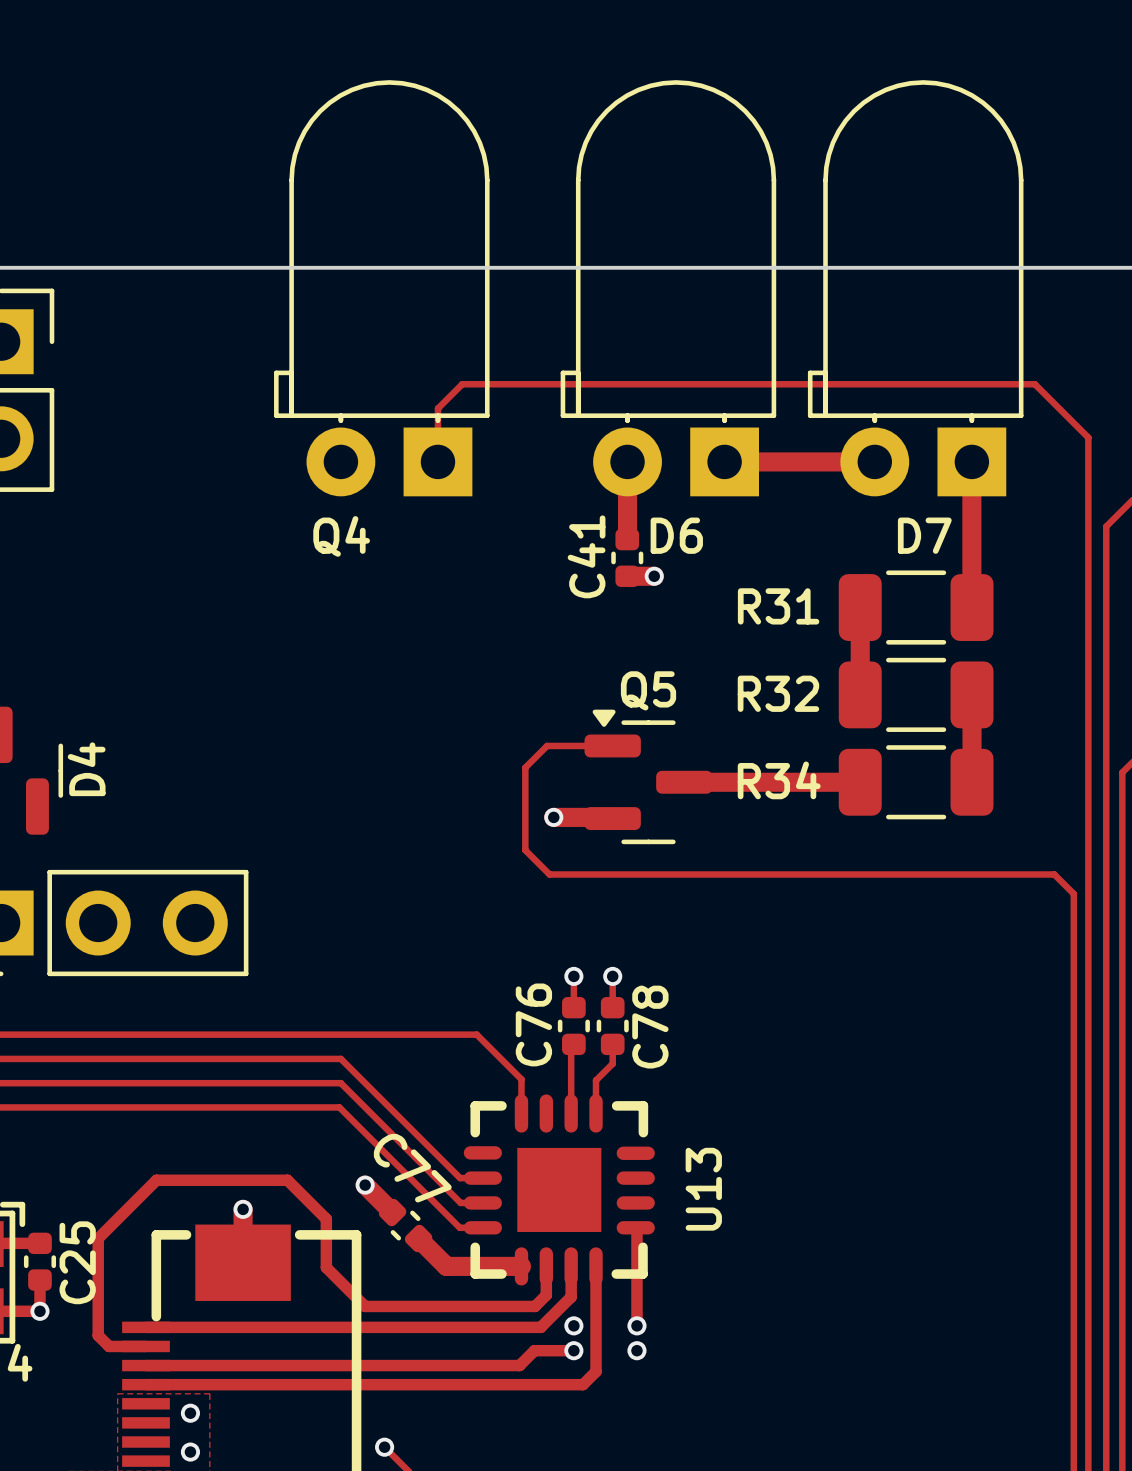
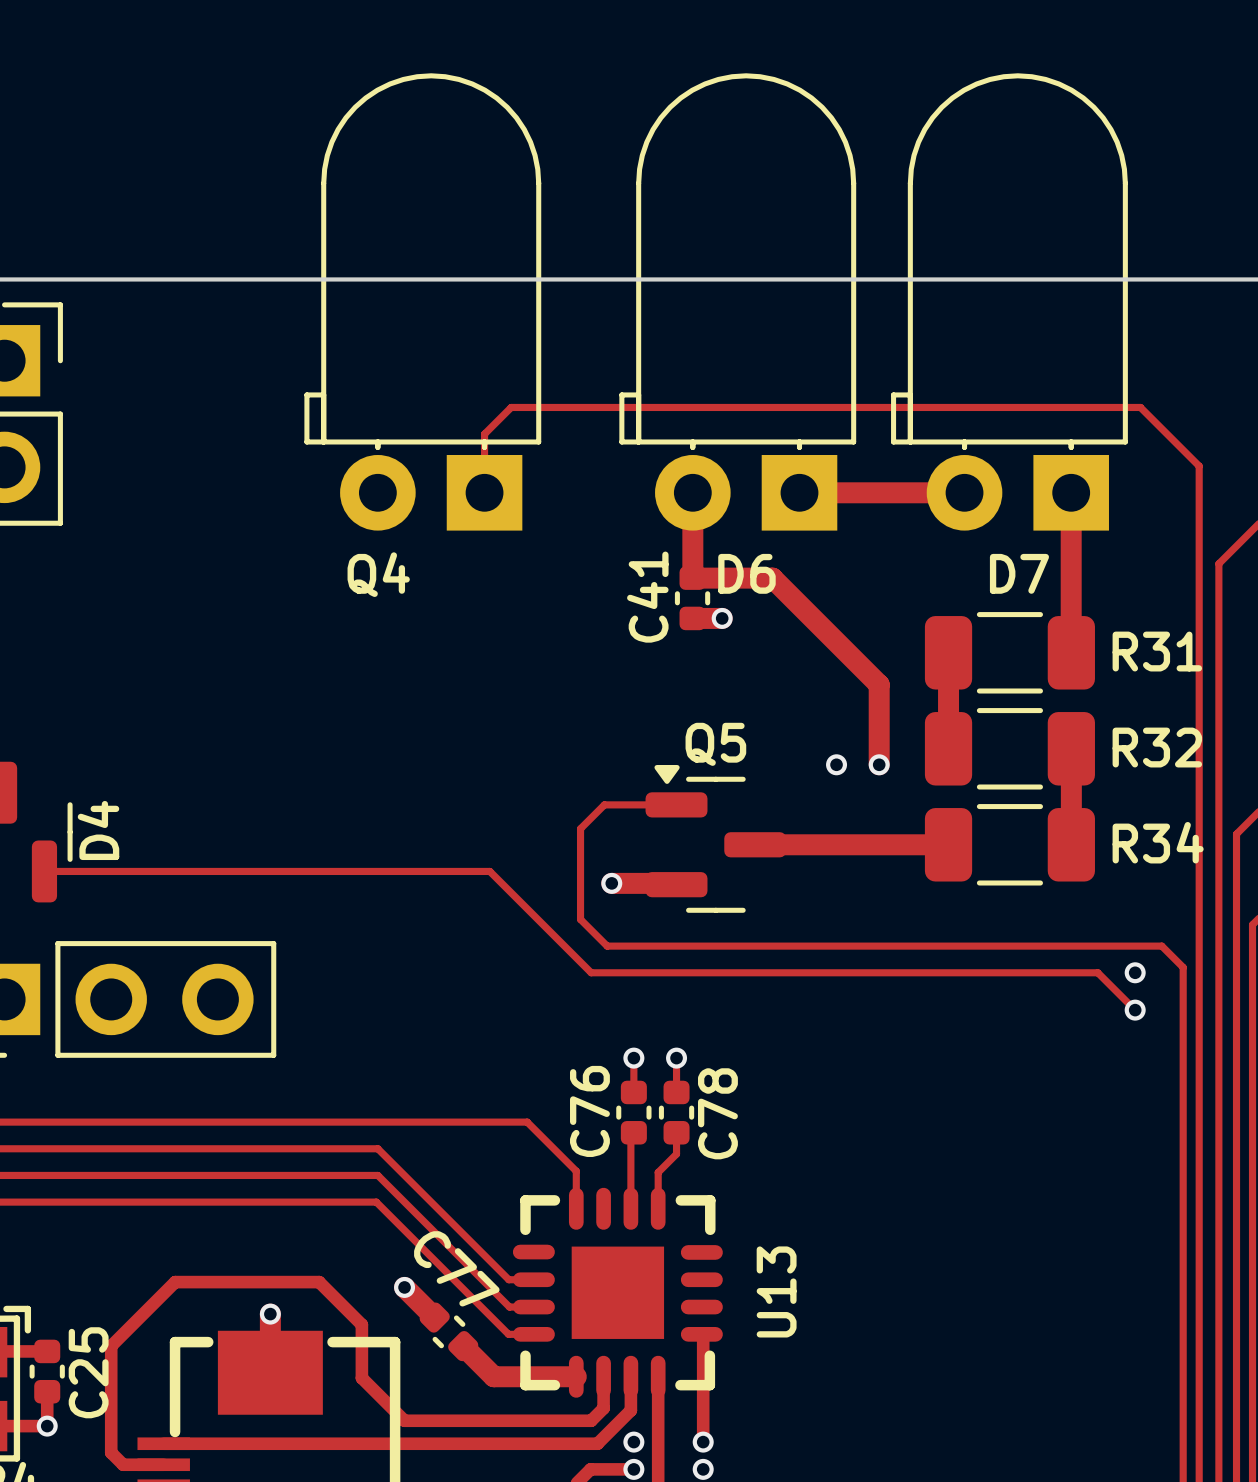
top track: none -> (692, 578) (772, 578) (879, 684) (879, 764)
R31 name position: R31 (778, 606) -> R31 (1157, 651)
R32 name position: R32 (778, 693) -> R32 (1157, 747)
via: none -> (836, 764)
via: none -> (879, 764)
R34 name position: R34 (779, 780) -> R34 (1158, 842)
top track: none -> (44, 871) (489, 871) (591, 972) (1097, 972) (1135, 1010)
via: none -> (1135, 972)
via: none -> (1135, 1010)

